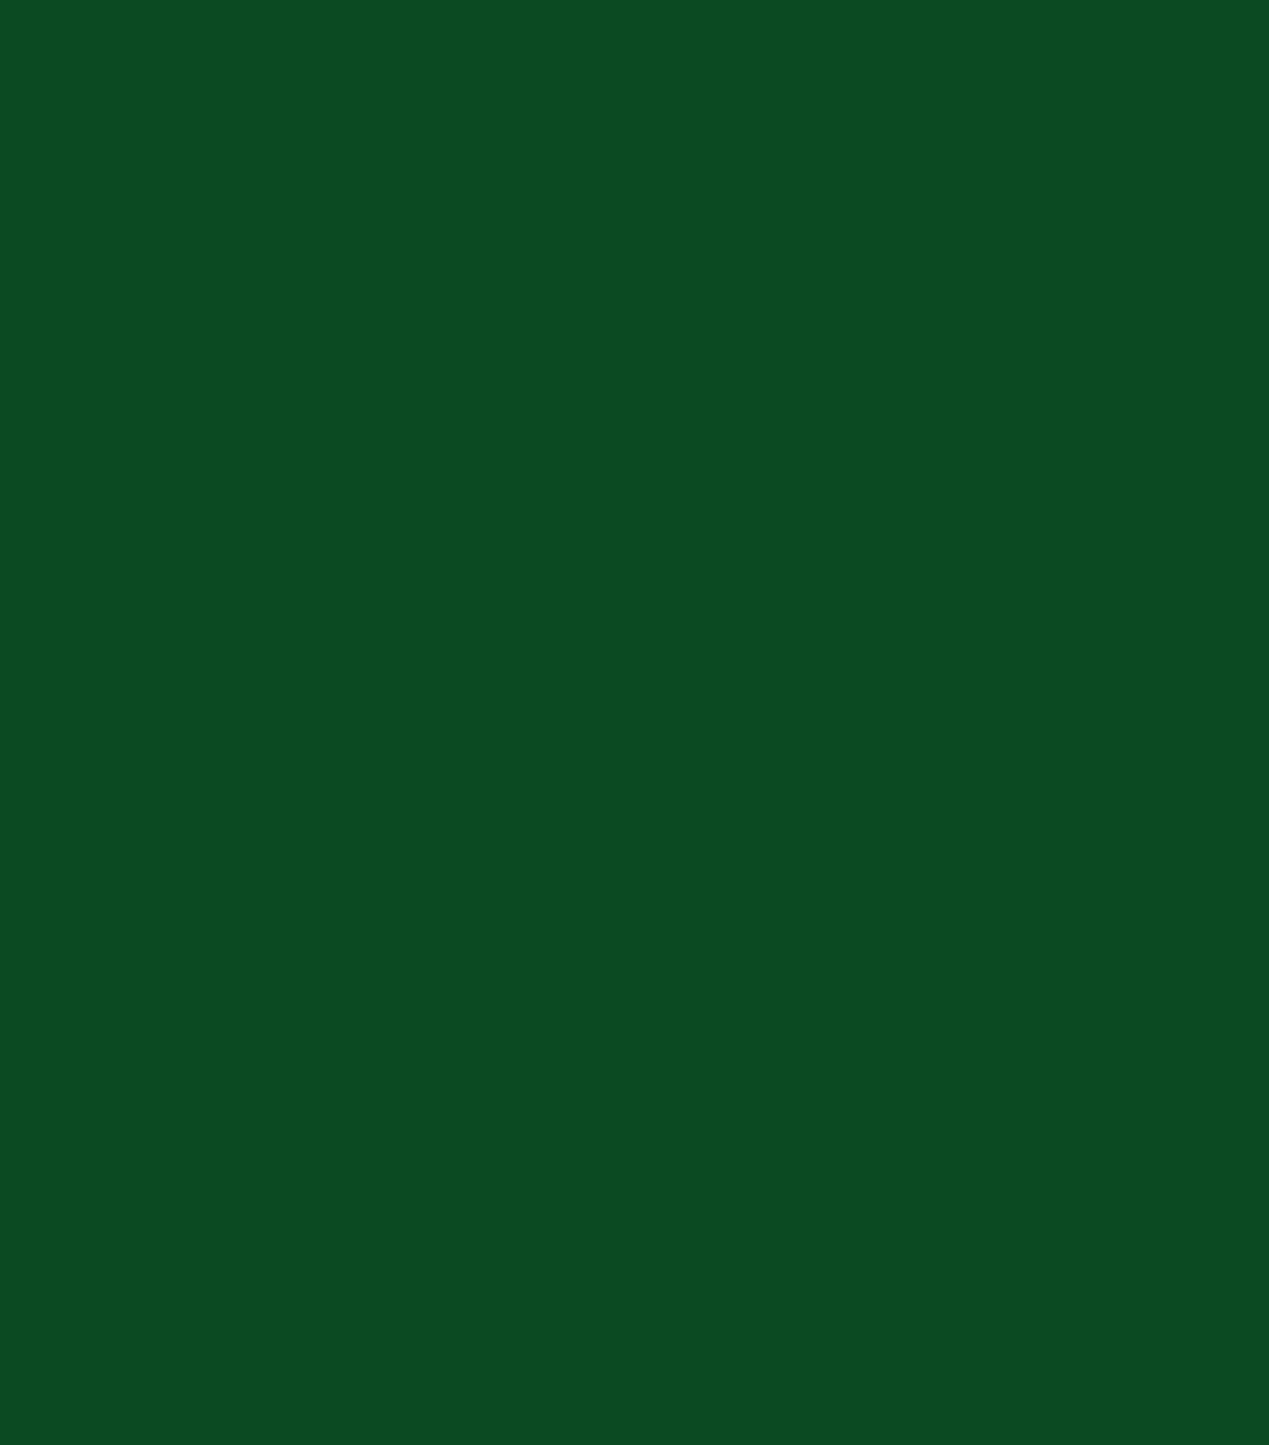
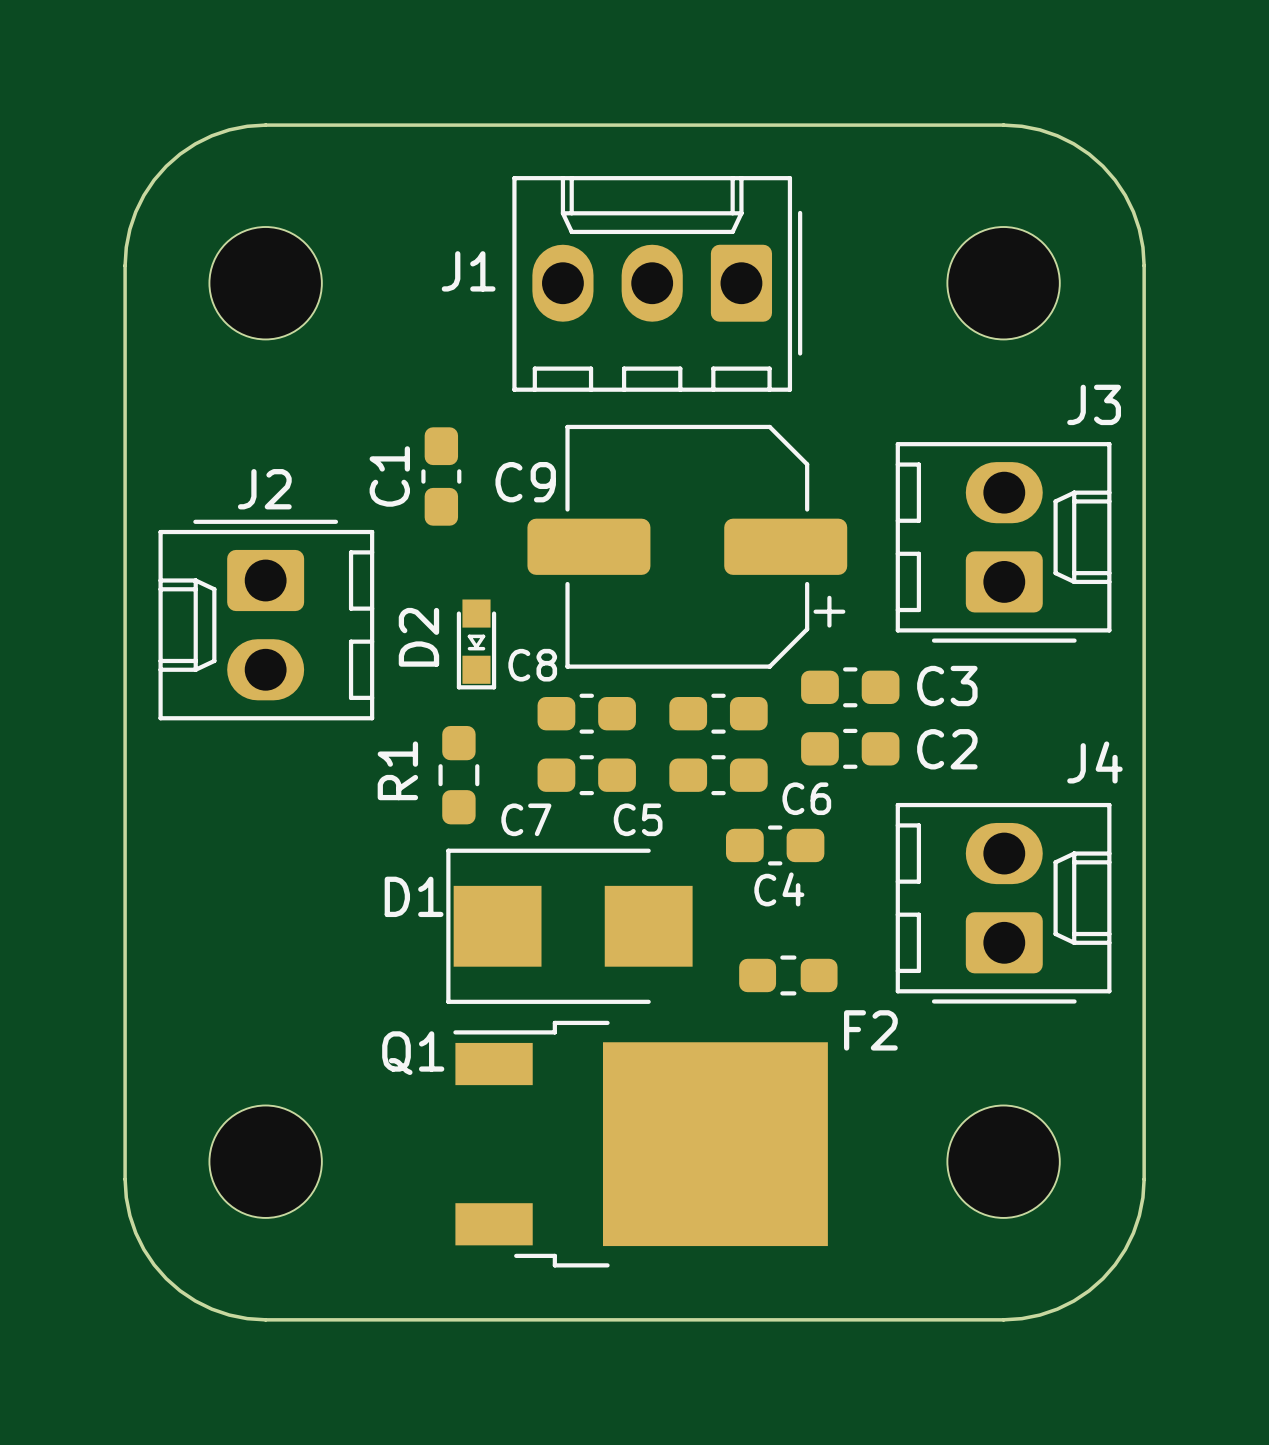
board edge: none -> (265, 125) (1003, 125) (1039, 129) (1073, 143) (1102, 166) (1115, 180) (1133, 211) (1139, 229) (1144, 265) (1144, 1179) (1139, 1215) (1125, 1249) (1115, 1264) (1089, 1290) (1057, 1309) (1039, 1315) (1003, 1319) (265, 1319) (229, 1315) (195, 1301) (180, 1290) (154, 1264) (135, 1233) (129, 1215) (125, 1179) (126, 247) (135, 211) (154, 180) (166, 166) (180, 154) (211, 135) (229, 129) (265, 125)
part: none -> (265, 283)
J1: none -> (657, 283)
part: none -> (1003, 283)
C1: none -> (441, 476)
J3: none -> (1003, 542)
C9: none -> (687, 546)
J2: none -> (266, 620)
D2: none -> (476, 644)
C3: none -> (850, 687)
C8: none -> (586, 713)
C5: none -> (718, 713)
C2: none -> (850, 748)
R1: none -> (458, 775)
C7: none -> (586, 775)
C6: none -> (718, 775)
C4: none -> (775, 845)
J4: none -> (1003, 903)
D1: none -> (569, 926)
F2: none -> (788, 975)
Q1: none -> (640, 1144)
part: none -> (265, 1161)
part: none -> (1003, 1161)

